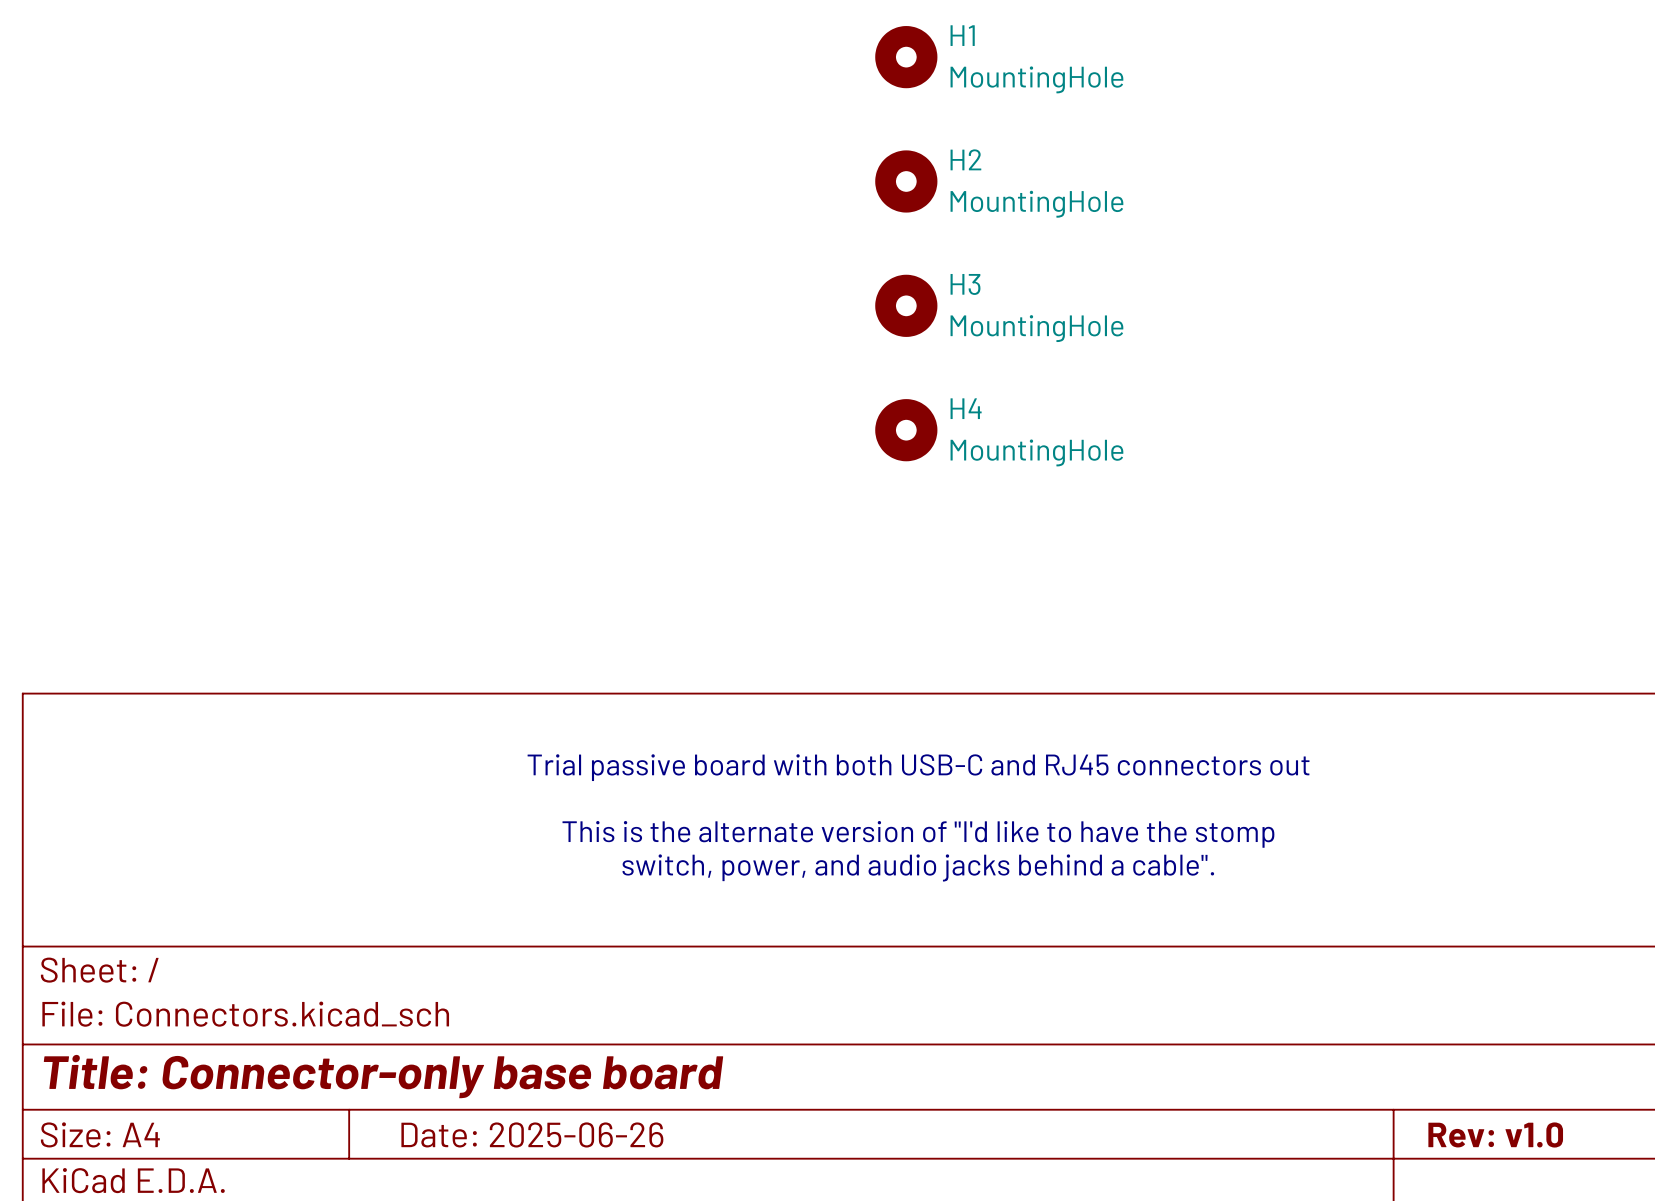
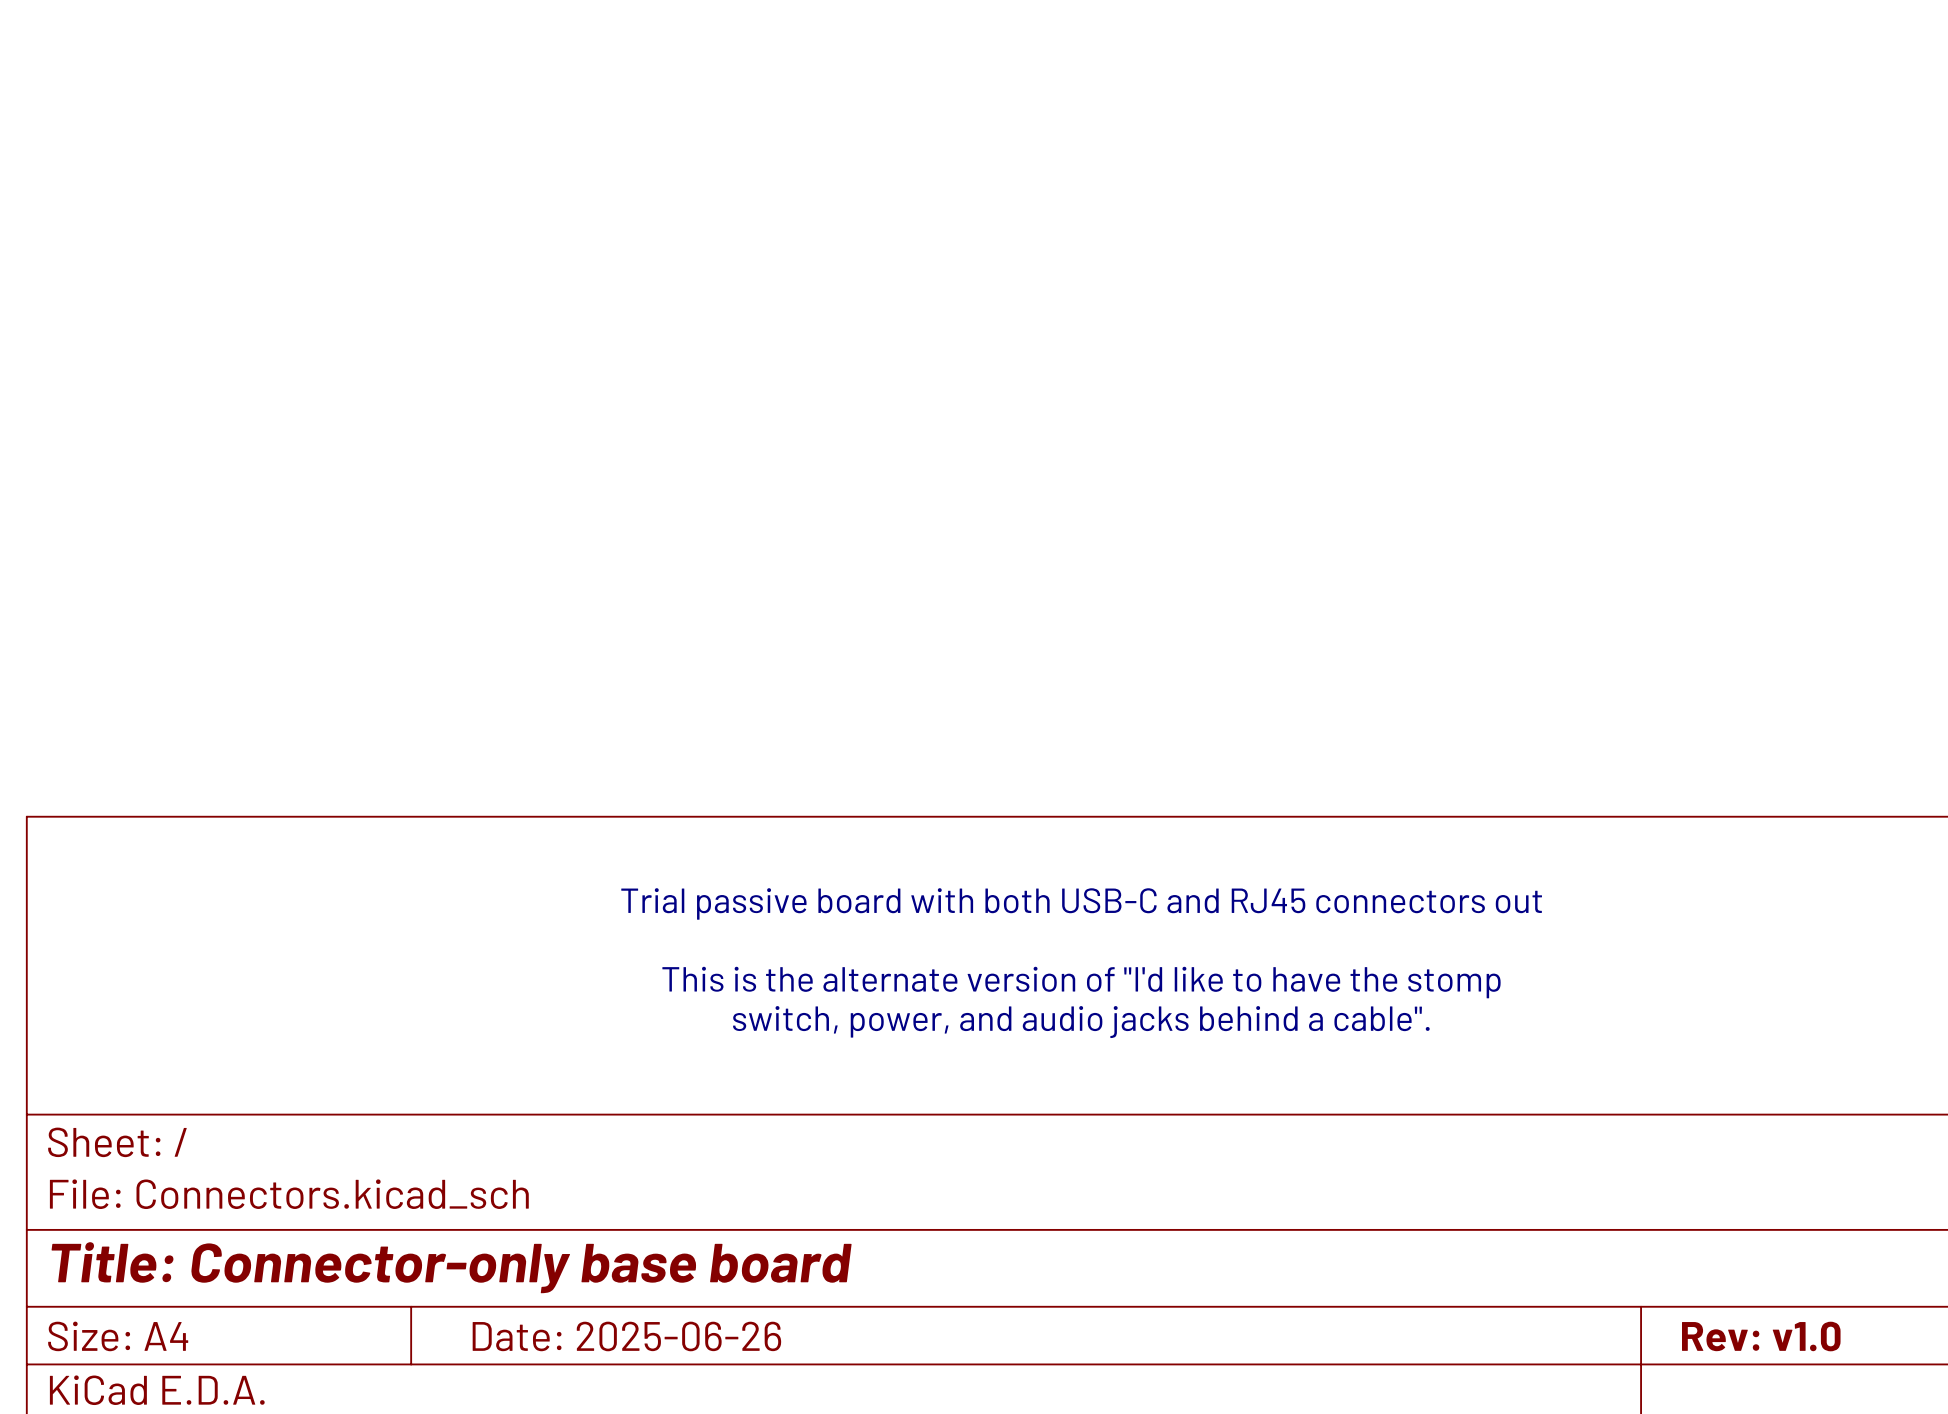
H1: MountingHole (906, 57) -> none
H2: MountingHole (906, 181) -> none
H3: MountingHole (906, 305) -> none
H4: MountingHole (906, 430) -> none

